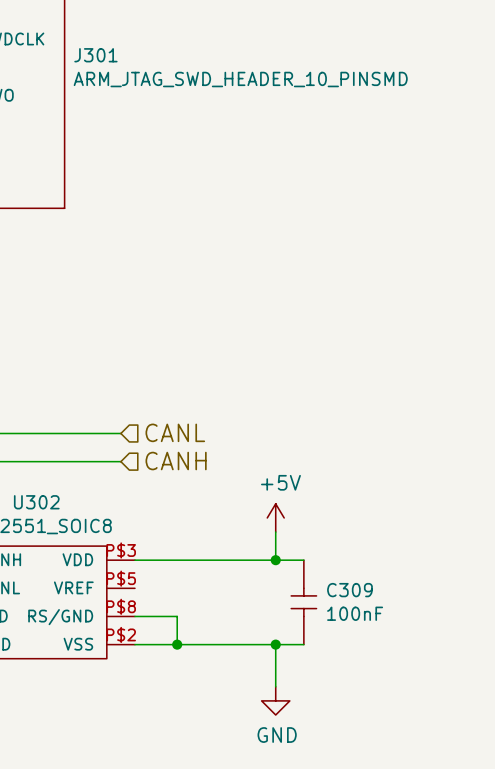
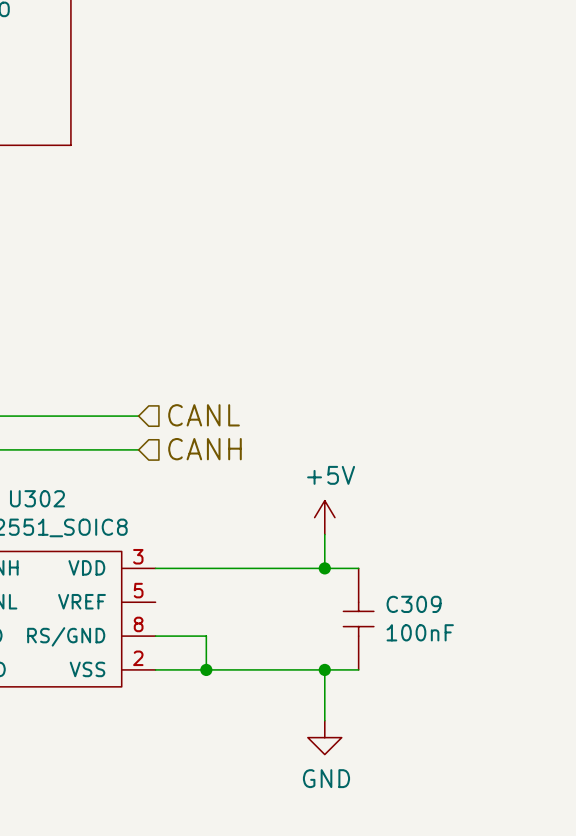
U302 pin number: P$3 (121, 550) -> 3 (138, 556)
U302 pin number: P$5 (121, 578) -> 5 (138, 590)
U302 pin number: P$8 (121, 606) -> 8 (138, 624)
U302 pin number: P$2 (121, 634) -> 2 (138, 658)

